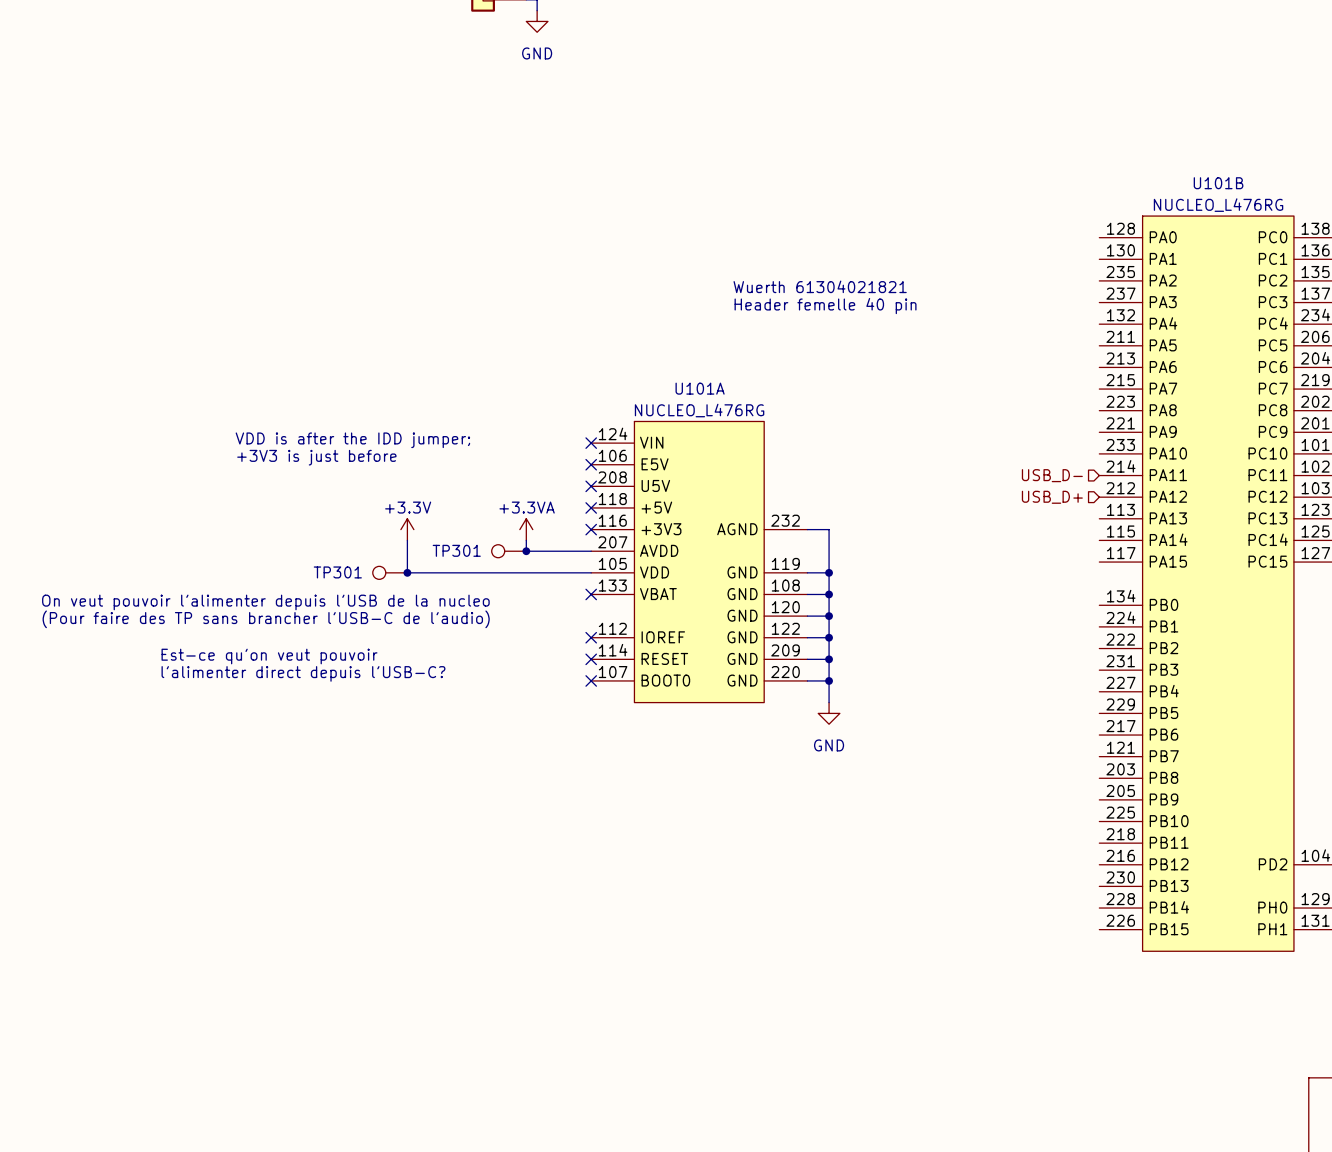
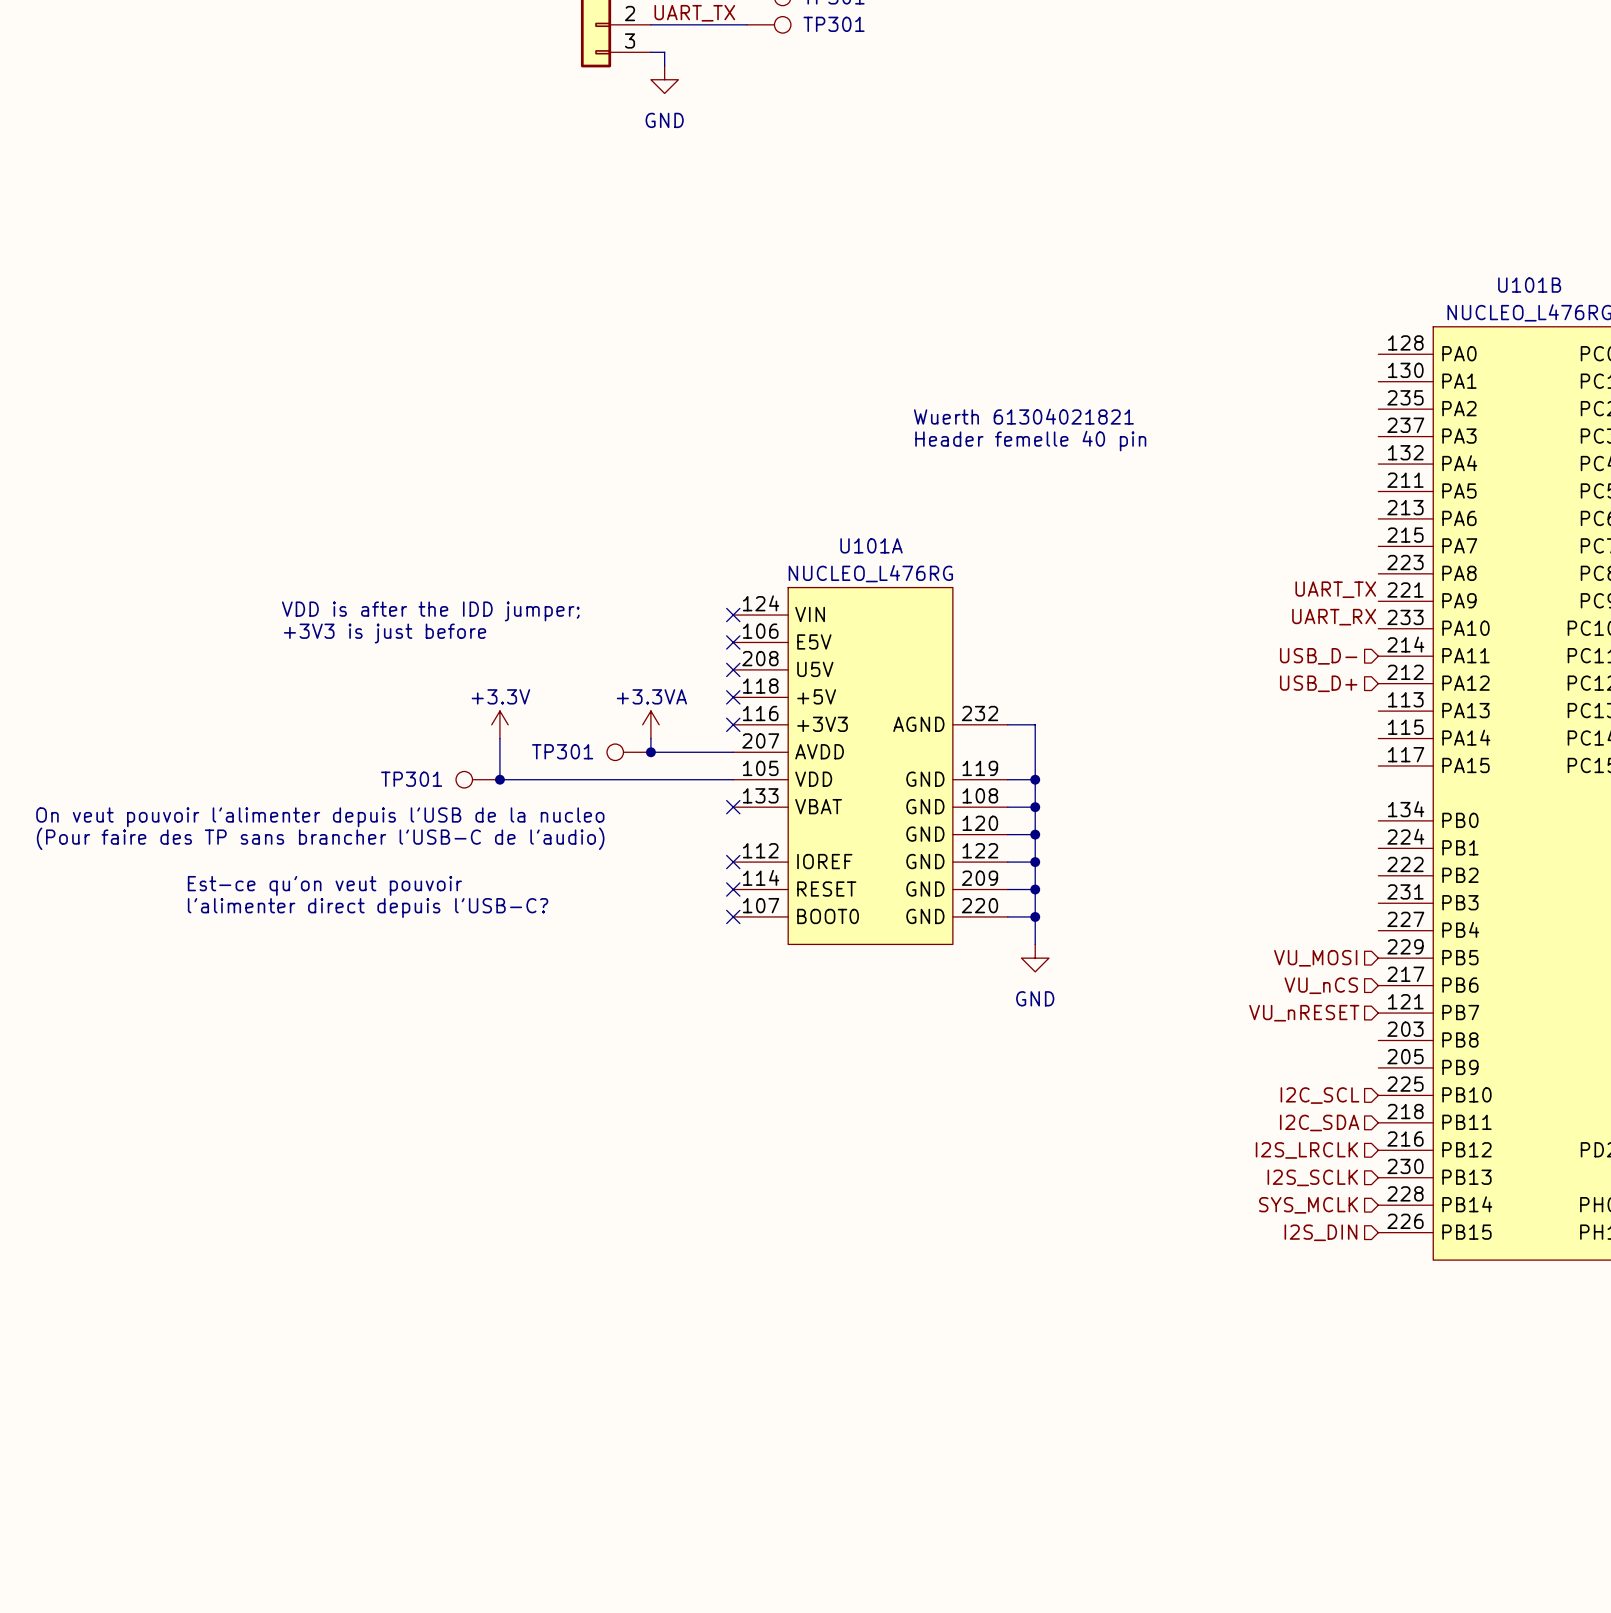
label: none -> UART_TX (1335, 589)
label: none -> UART_RX (1334, 617)
hierarchical label: none -> VU_MOSI (1315, 958)
hierarchical label: none -> VU_nCS (1321, 985)
hierarchical label: none -> VU_nRESET (1304, 1013)
hierarchical label: none -> I2C_SCL (1319, 1095)
hierarchical label: none -> I2C_SDA (1319, 1122)
hierarchical label: none -> I2S_LRCLK (1306, 1150)
hierarchical label: none -> I2S_SCLK (1312, 1177)
hierarchical label: none -> SYS_MCLK (1308, 1205)
hierarchical label: none -> I2S_DIN (1320, 1232)

